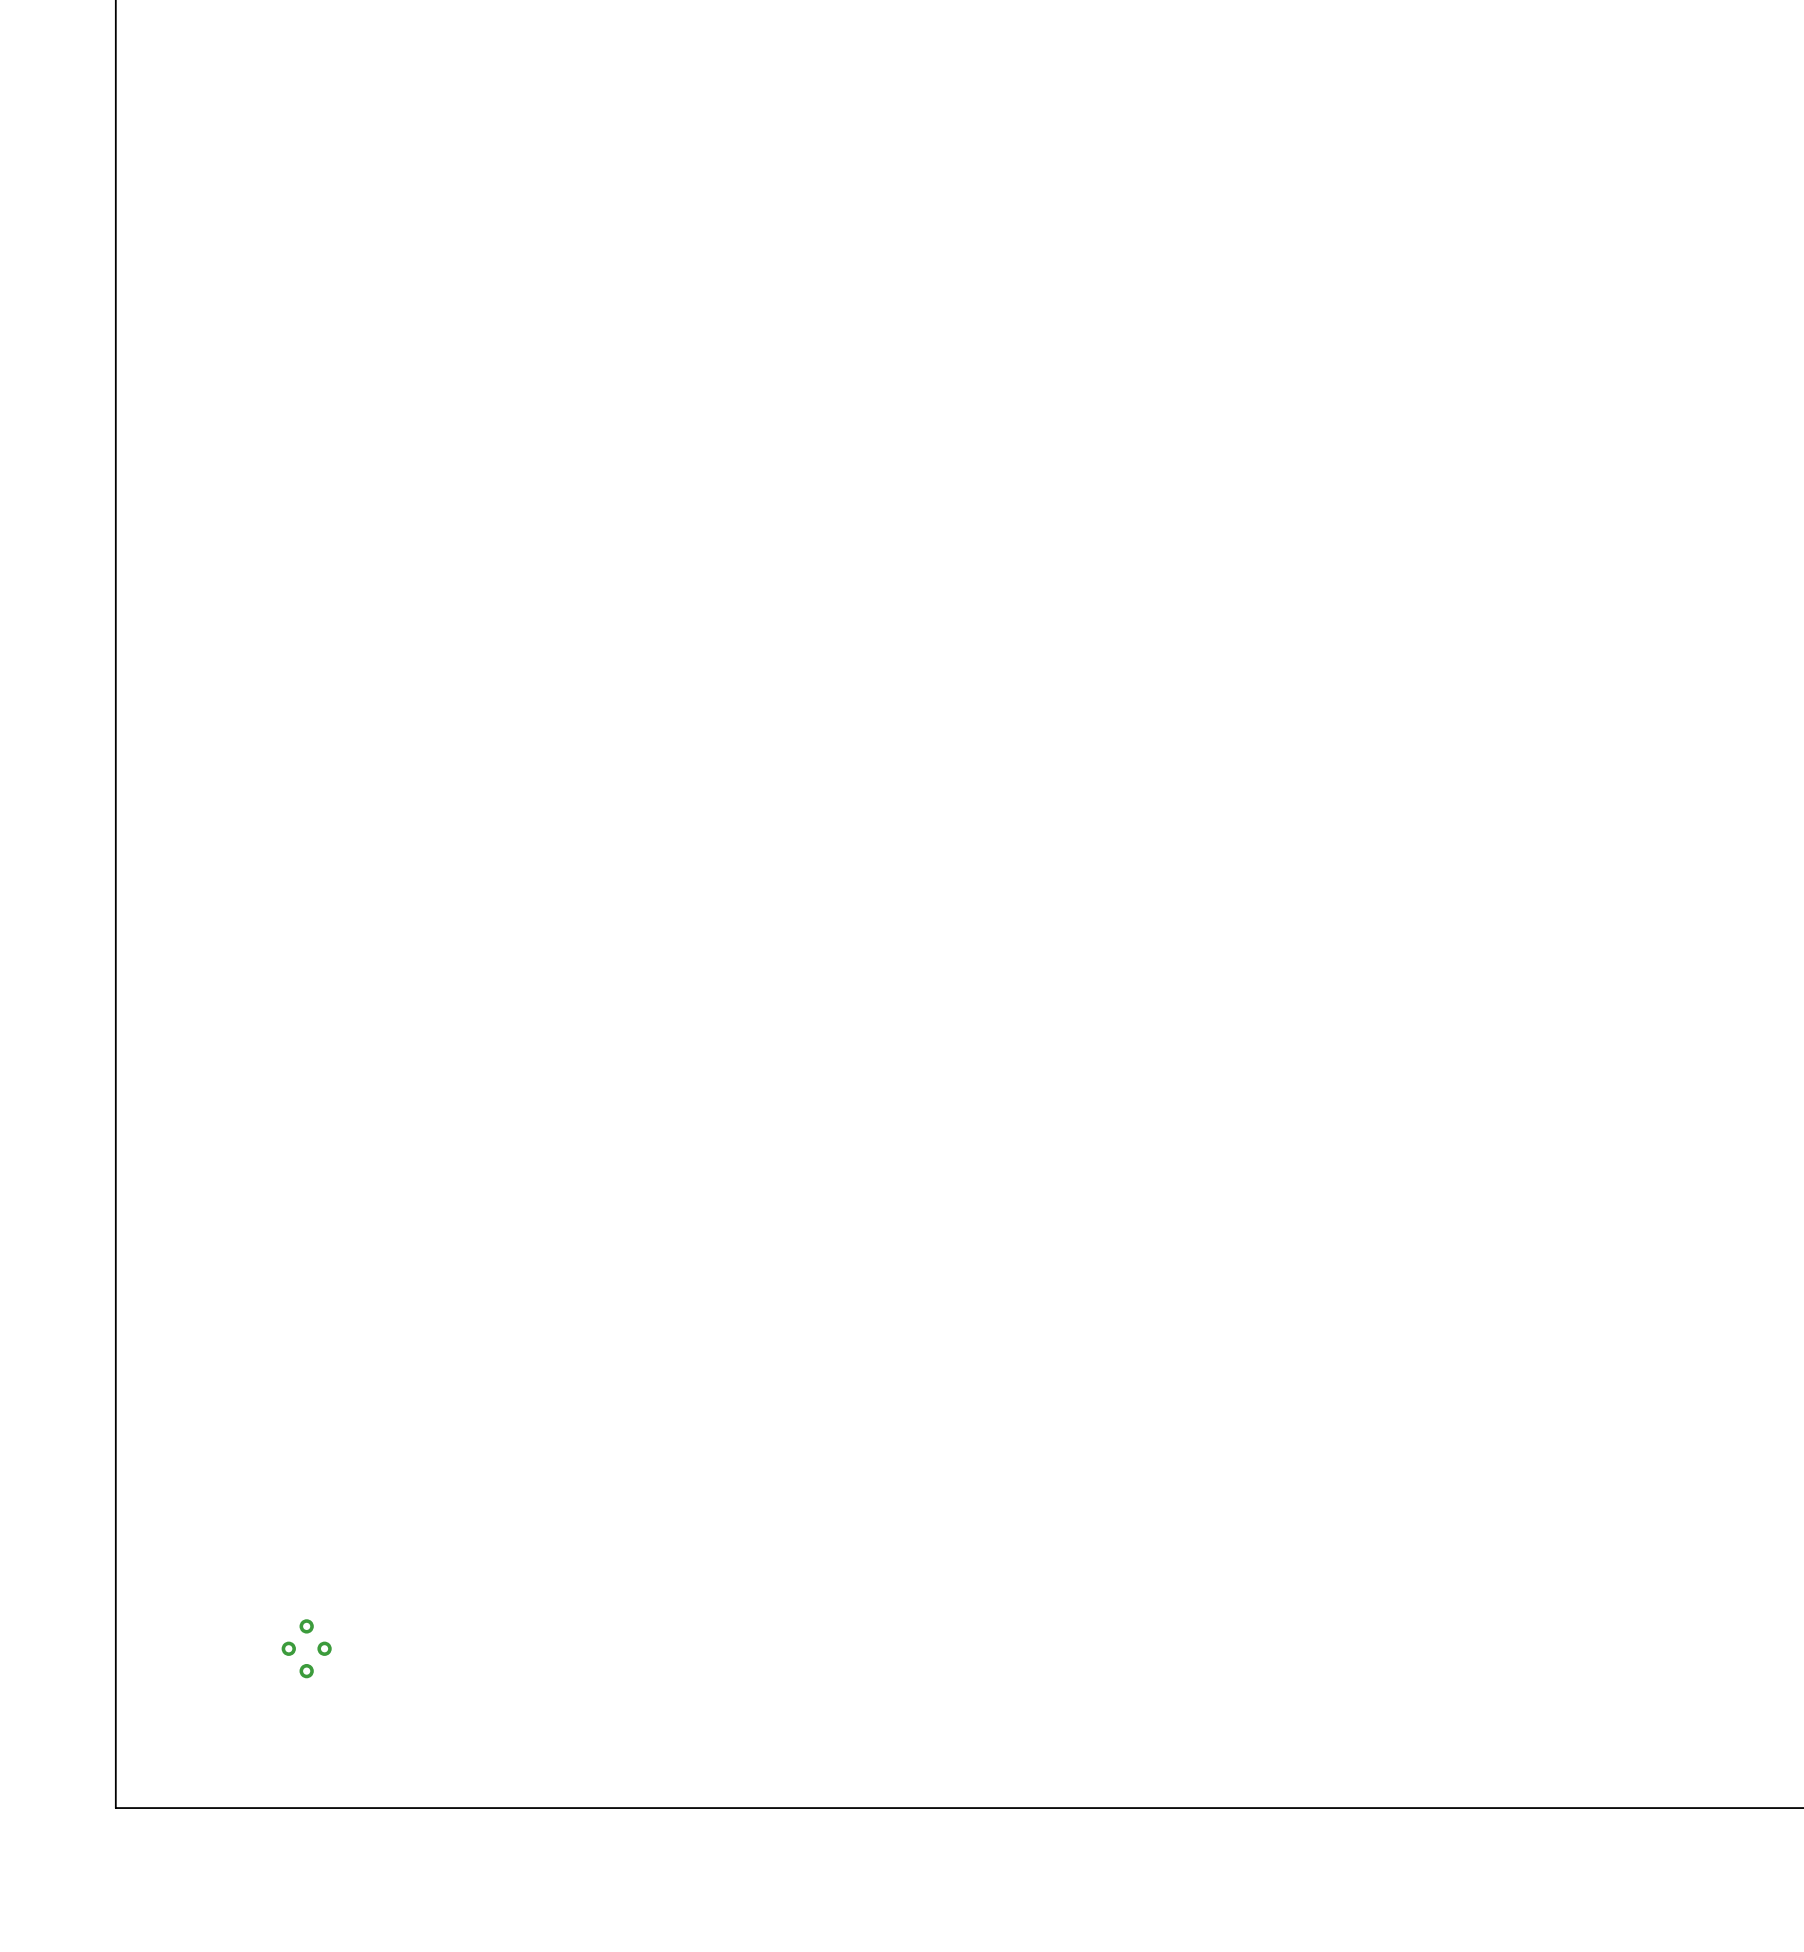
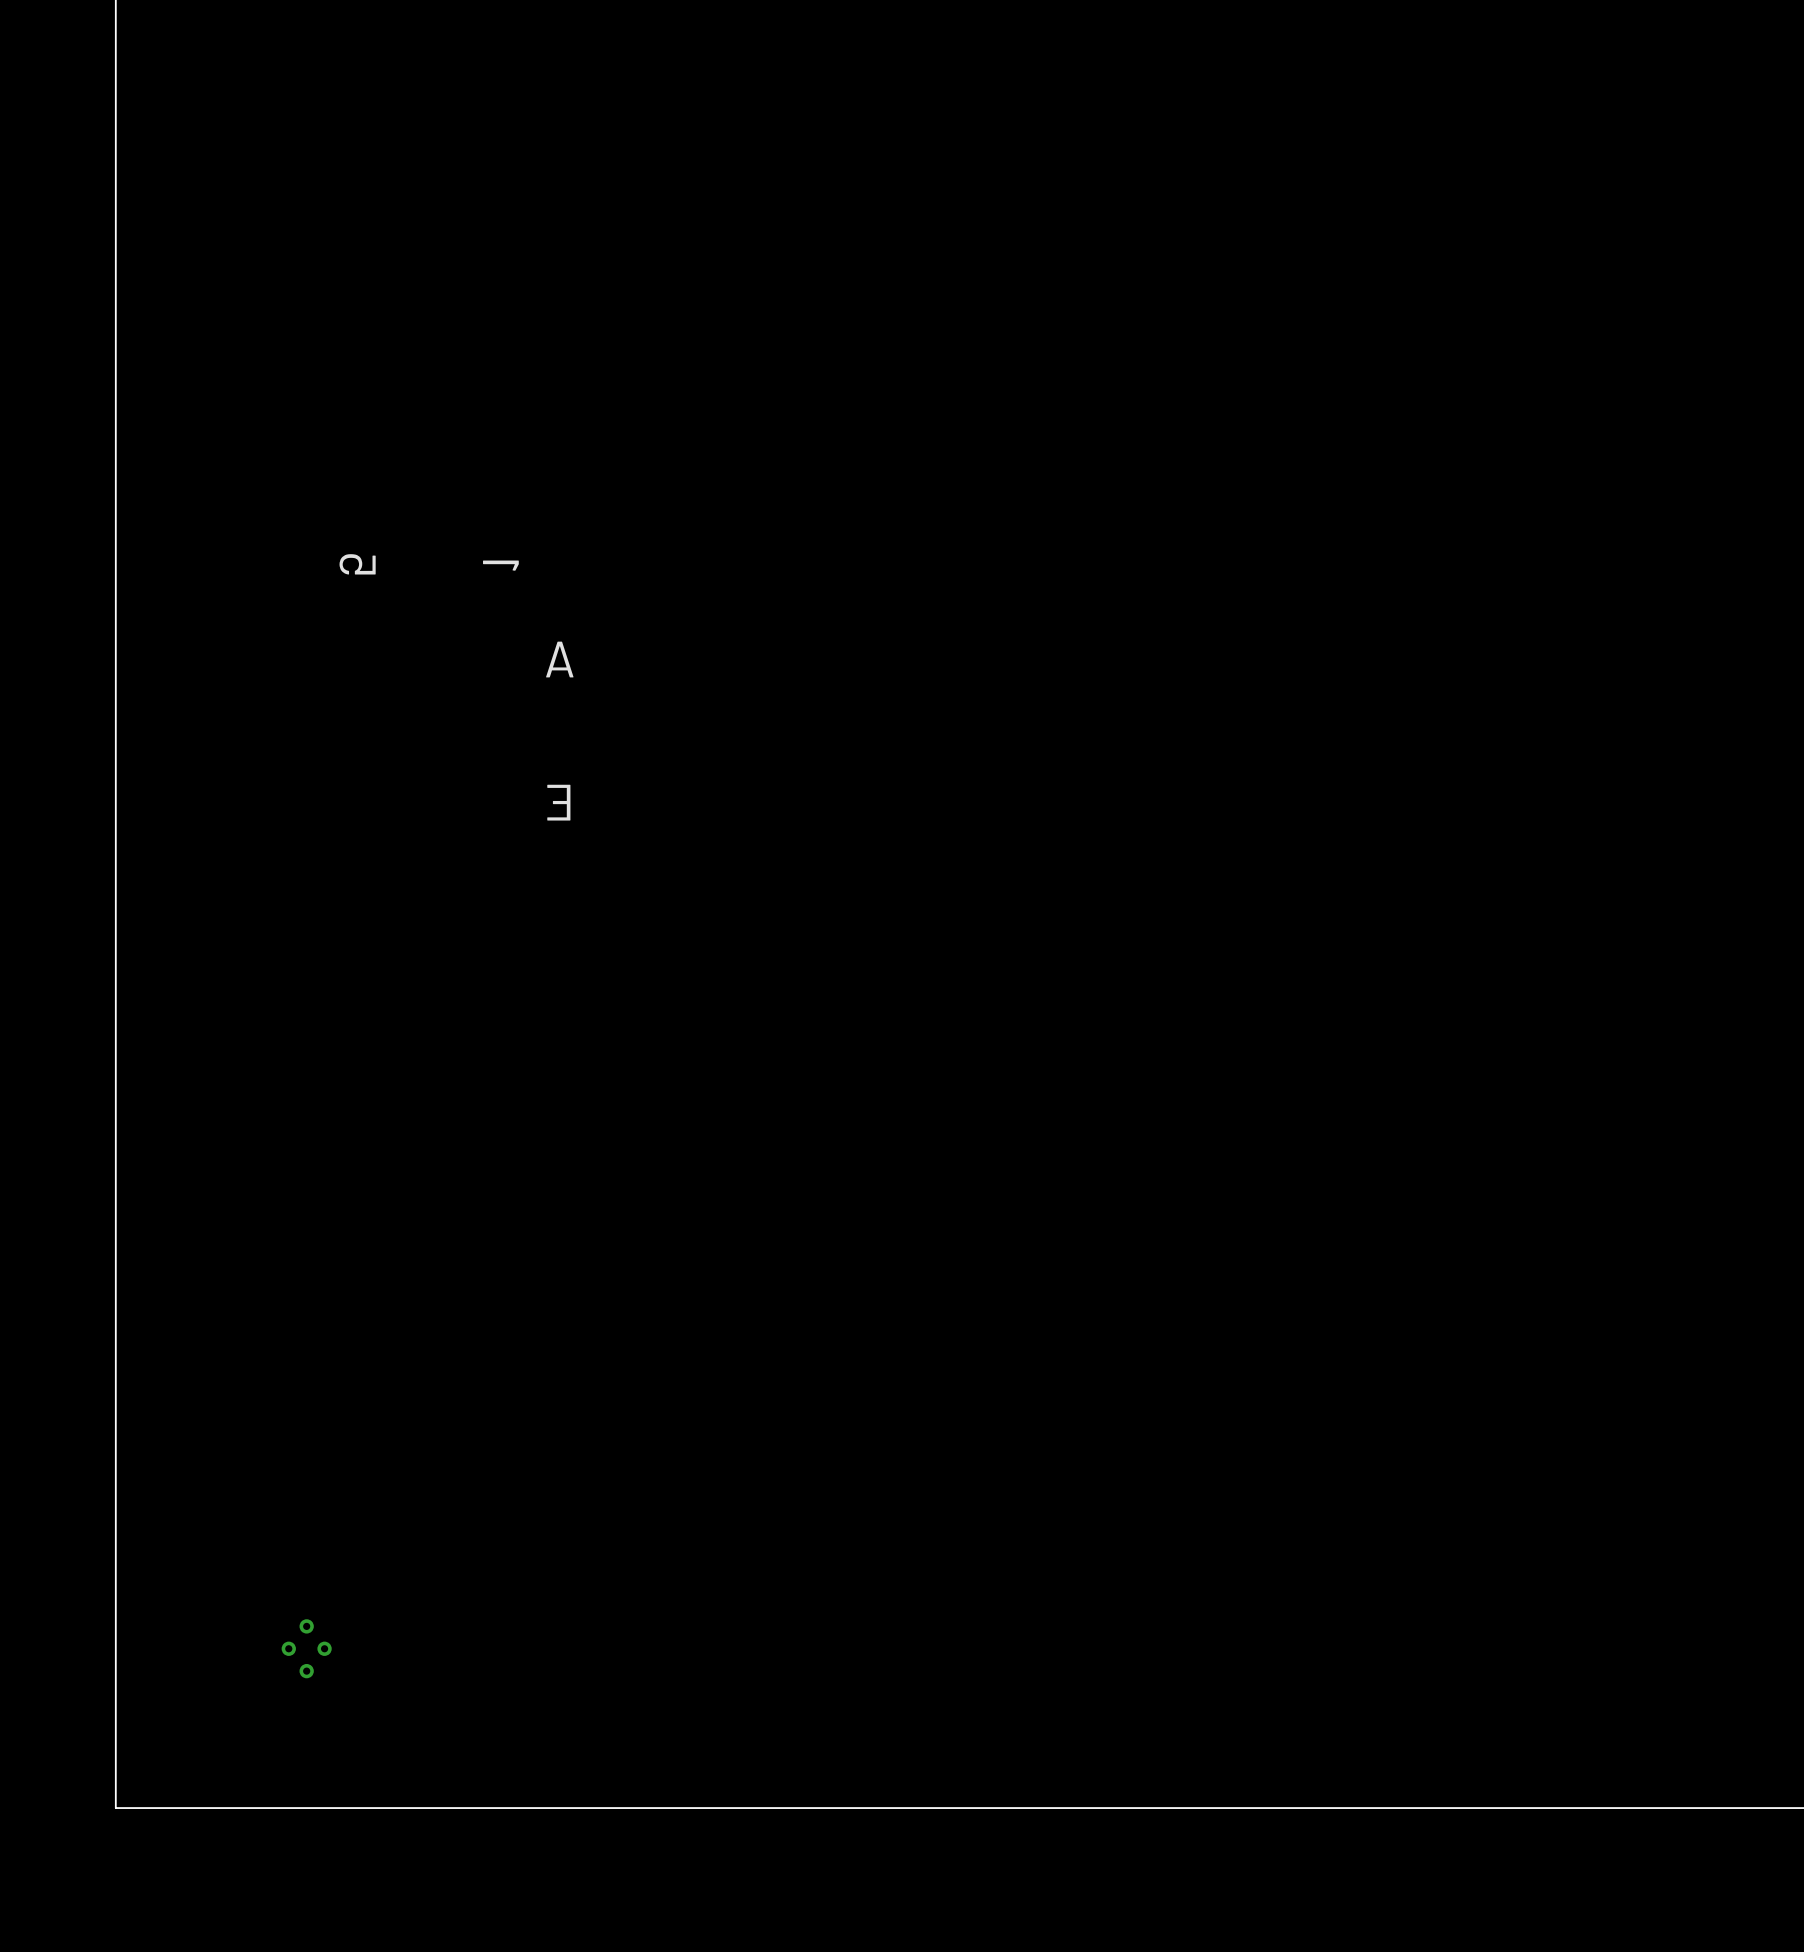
part: none -> (456, 687)

